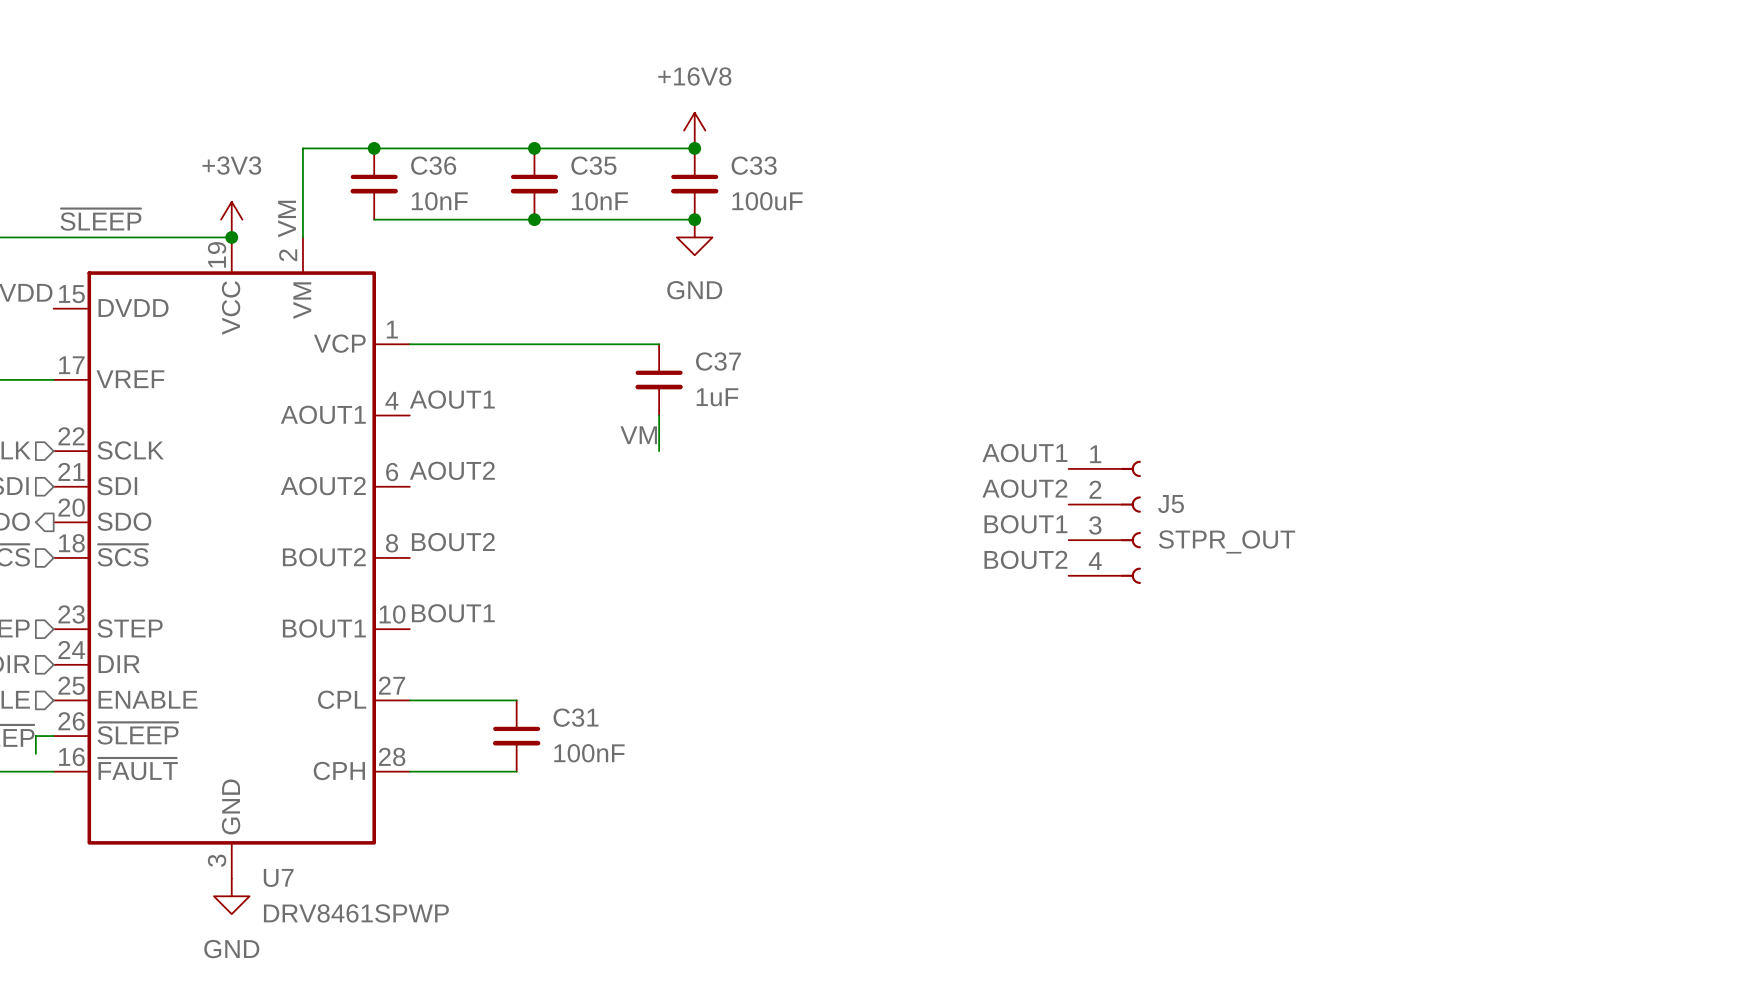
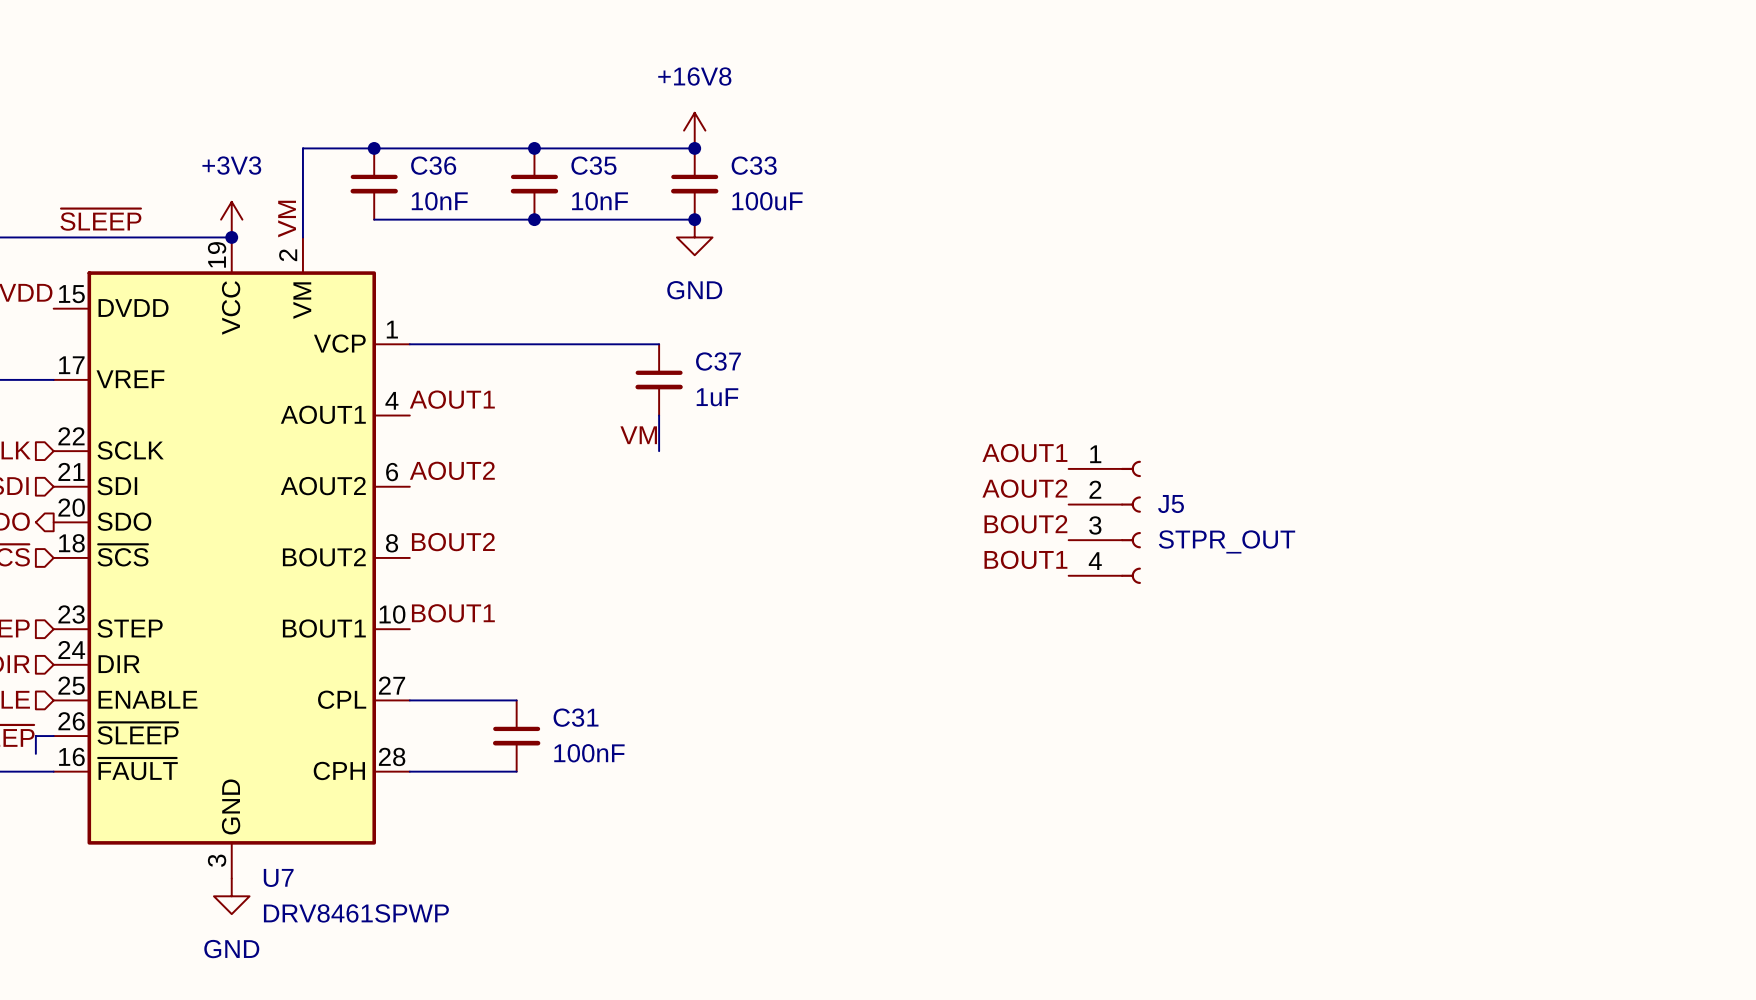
label: BOUT1 (1025, 524) -> BOUT2 (1025, 524)
label: BOUT2 (1025, 559) -> BOUT1 (1025, 559)

